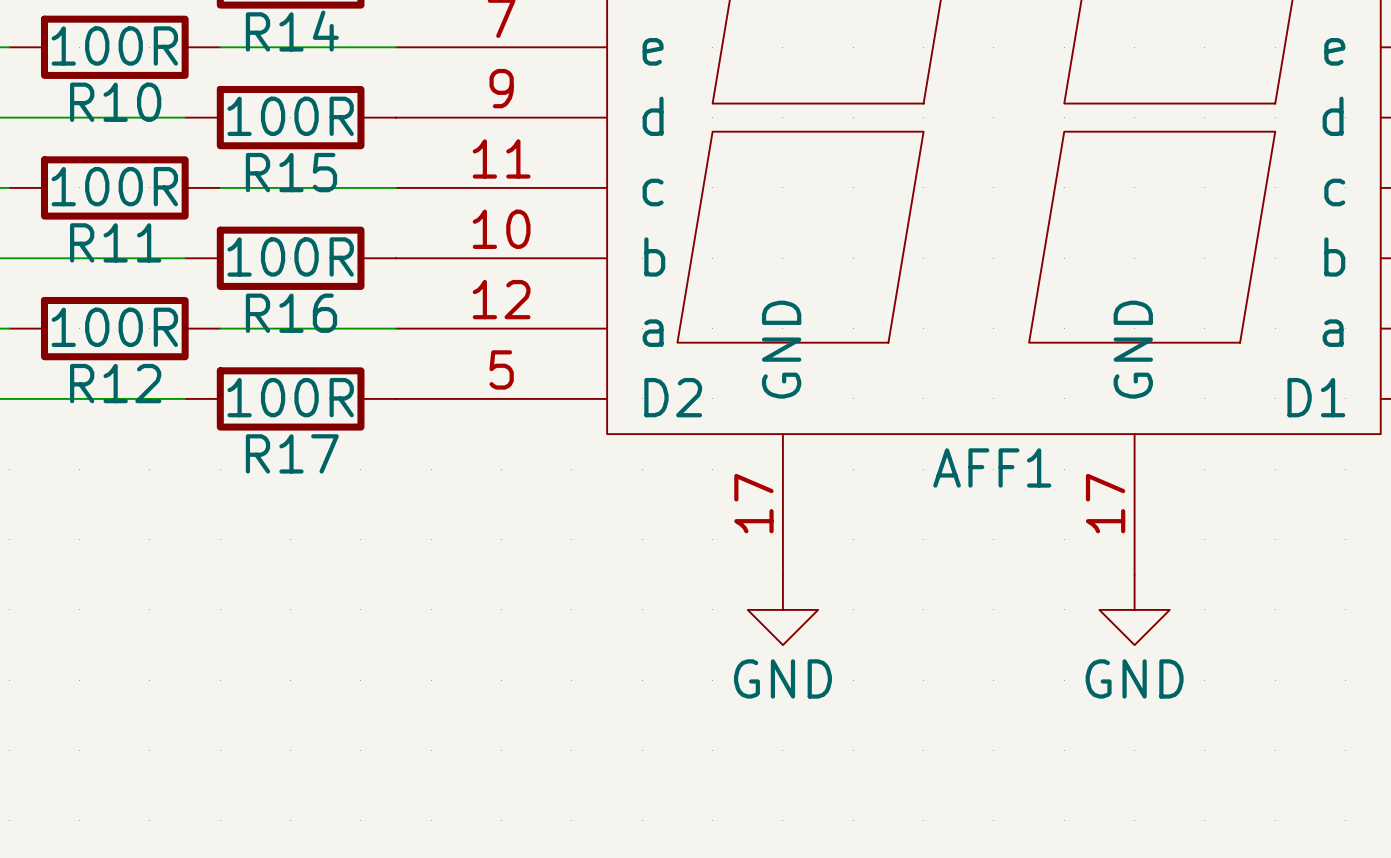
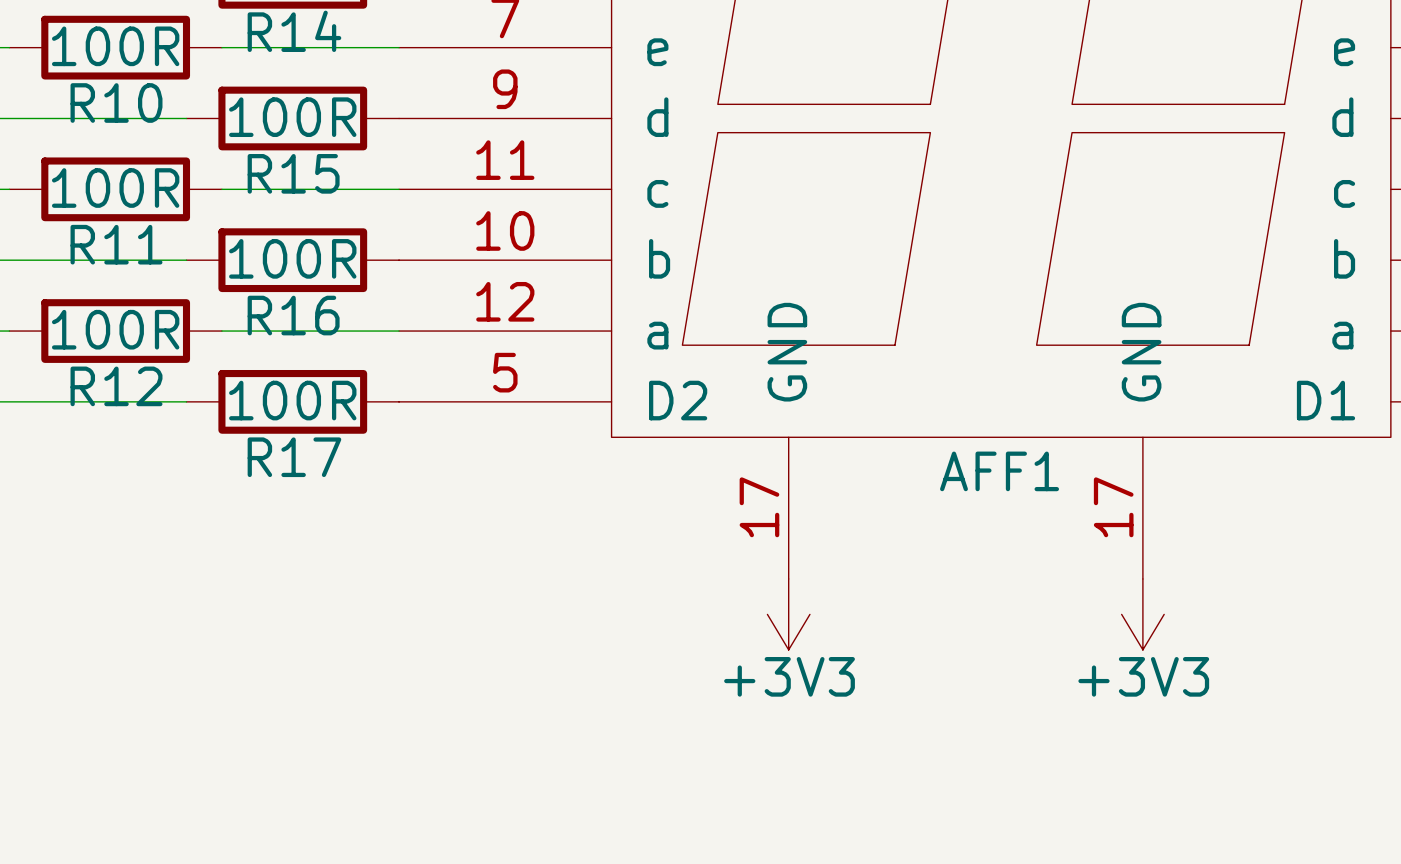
power symbol: GND (782, 609) -> +3V3 (788, 614)
power symbol: GND (1134, 609) -> +3V3 (1142, 614)

